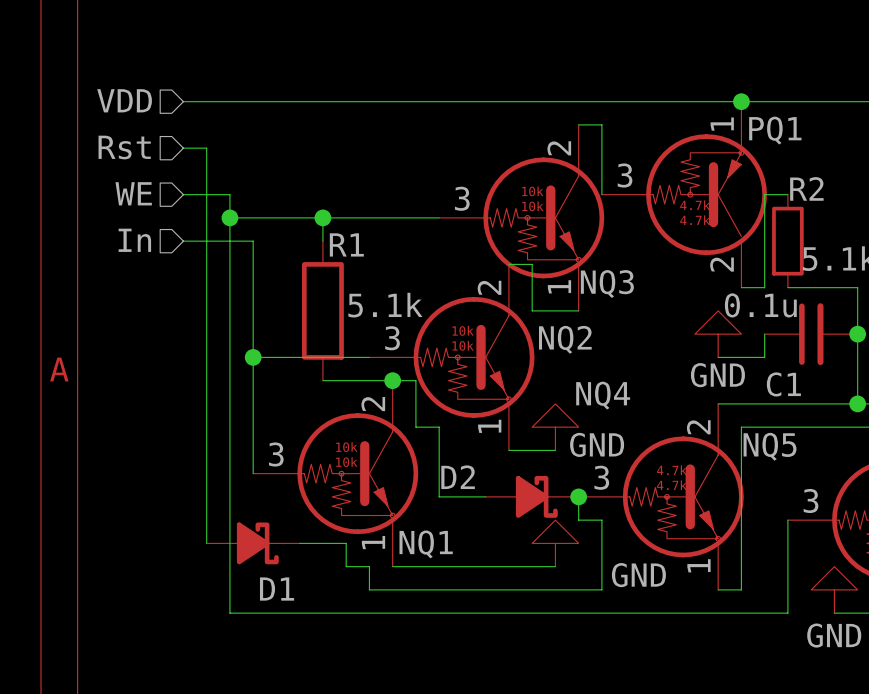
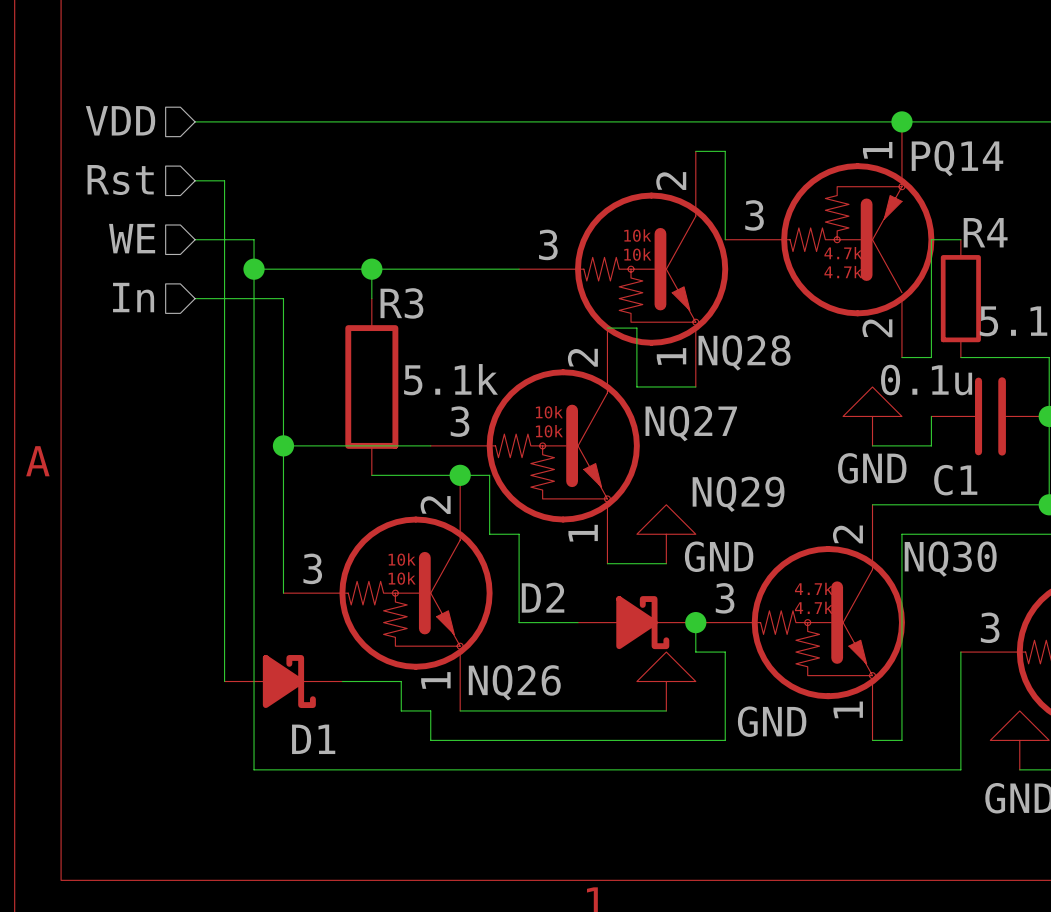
PQ1 name: PQ1 (775, 130) -> PQ14 (957, 158)
R2 name: R2 (806, 188) -> R4 (985, 232)
R1 name: R1 (346, 244) -> R3 (401, 303)
NQ3 name: NQ3 (607, 284) -> NQ28 (744, 352)
NQ2 name: NQ2 (565, 339) -> NQ27 (691, 423)
NQ4 name: NQ4 (603, 395) -> NQ29 (738, 494)
NQ5 name: NQ5 (770, 446) -> NQ30 (950, 559)
NQ1 name: NQ1 (426, 544) -> NQ26 (514, 682)

